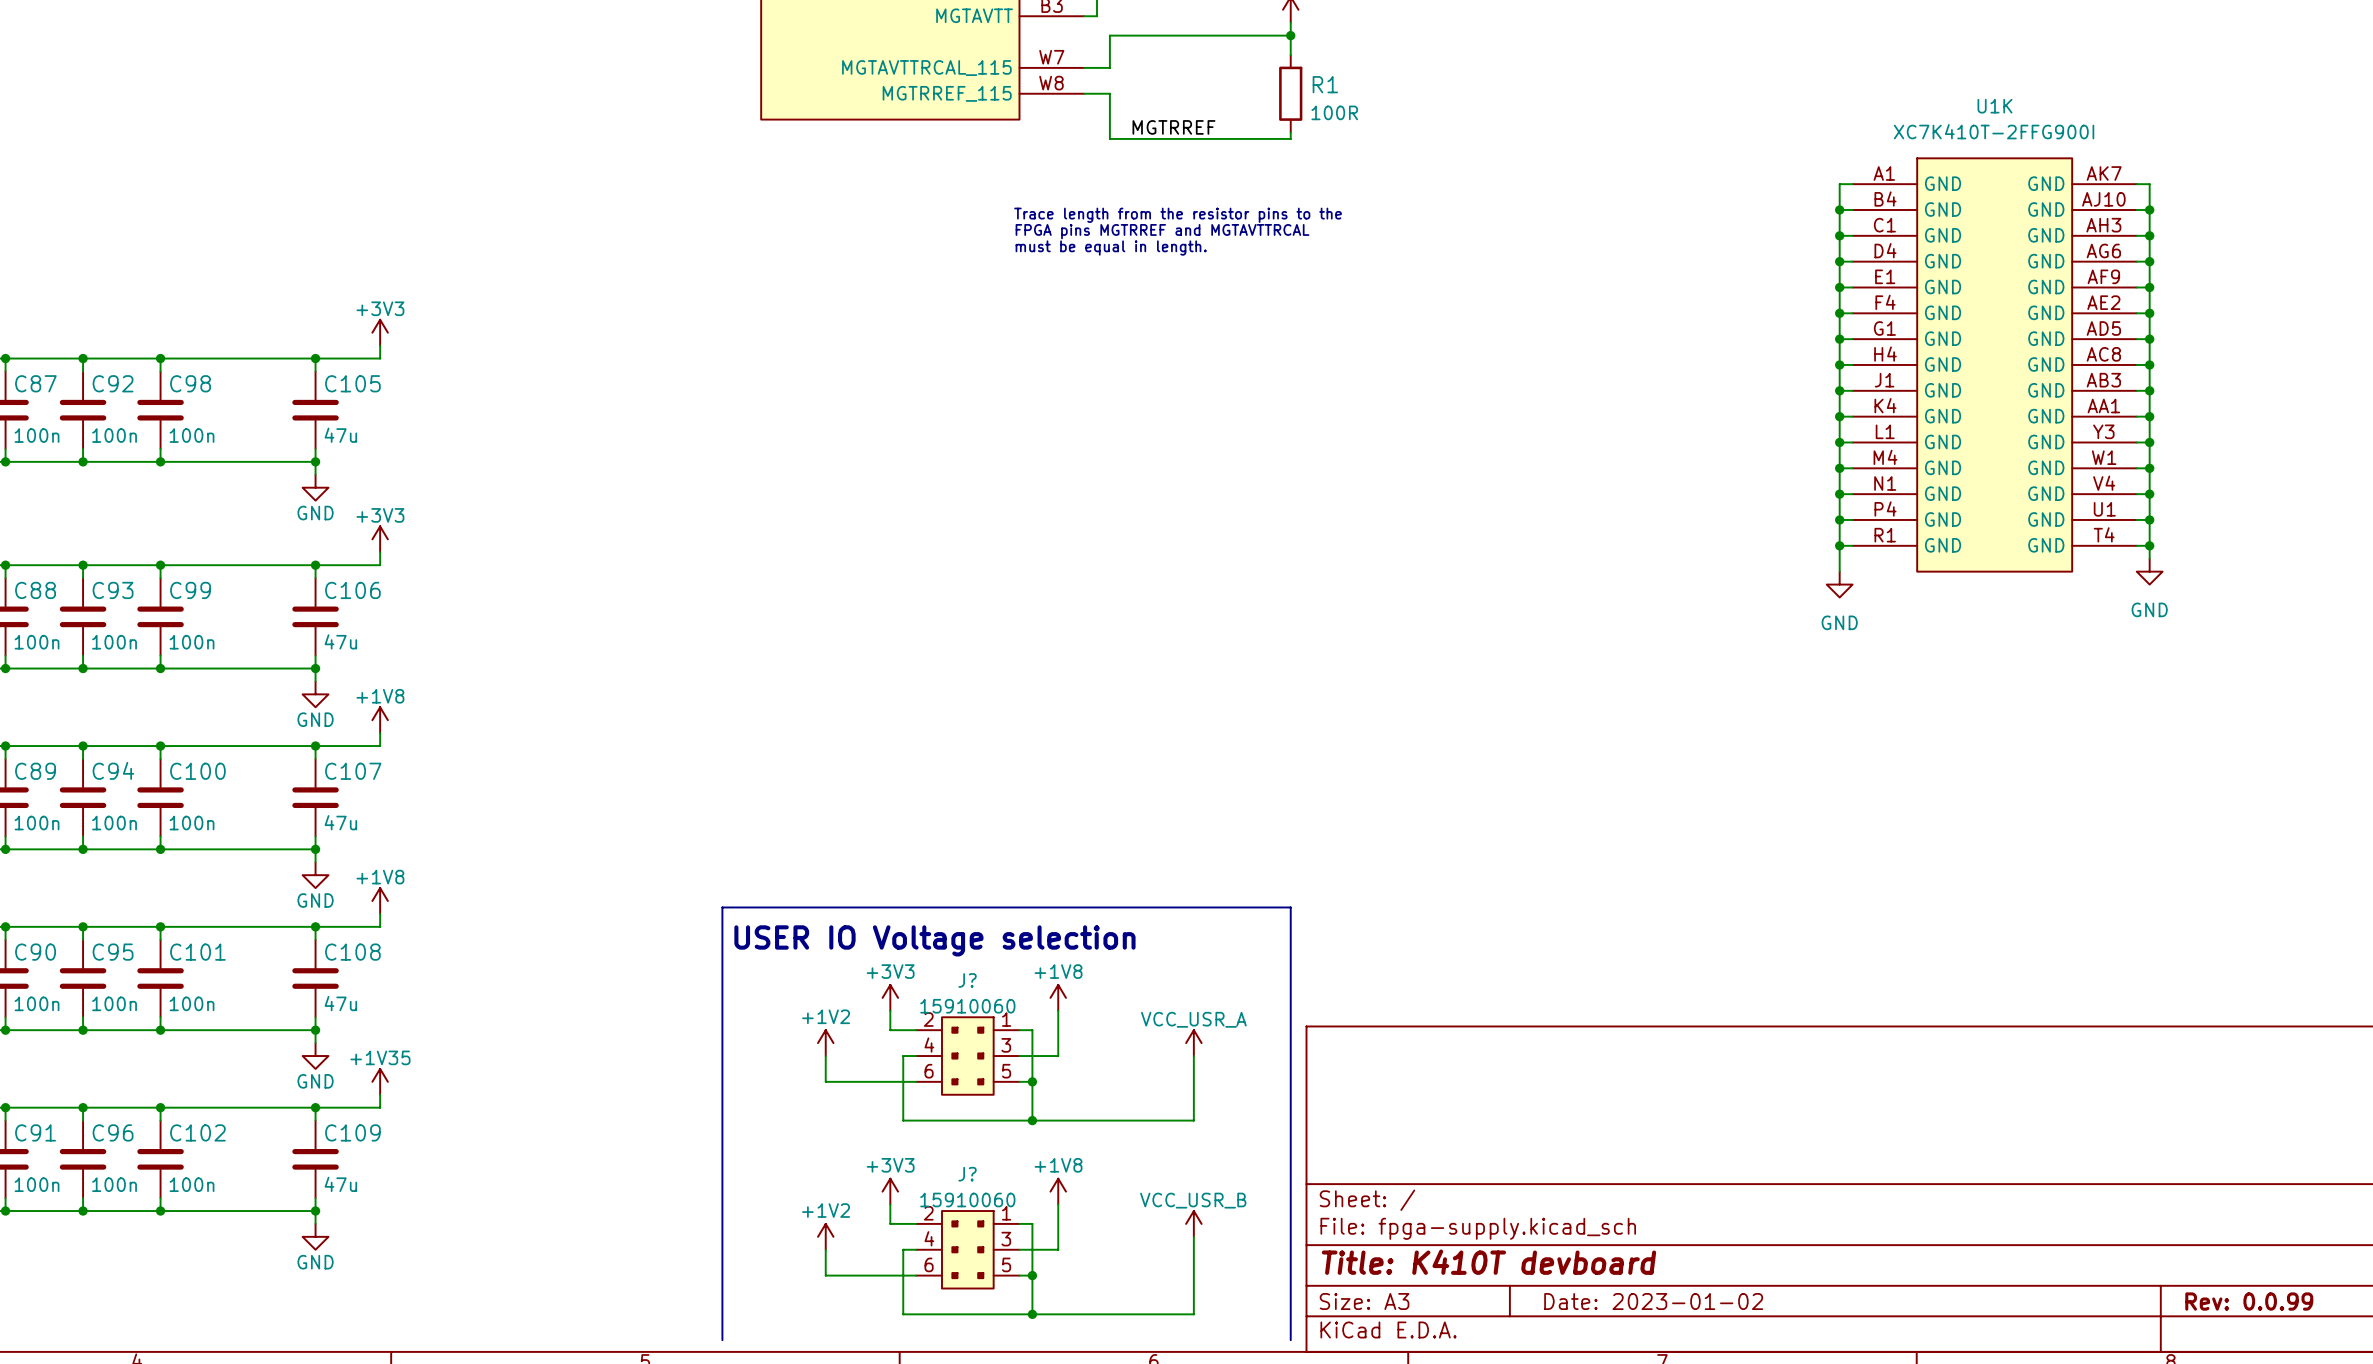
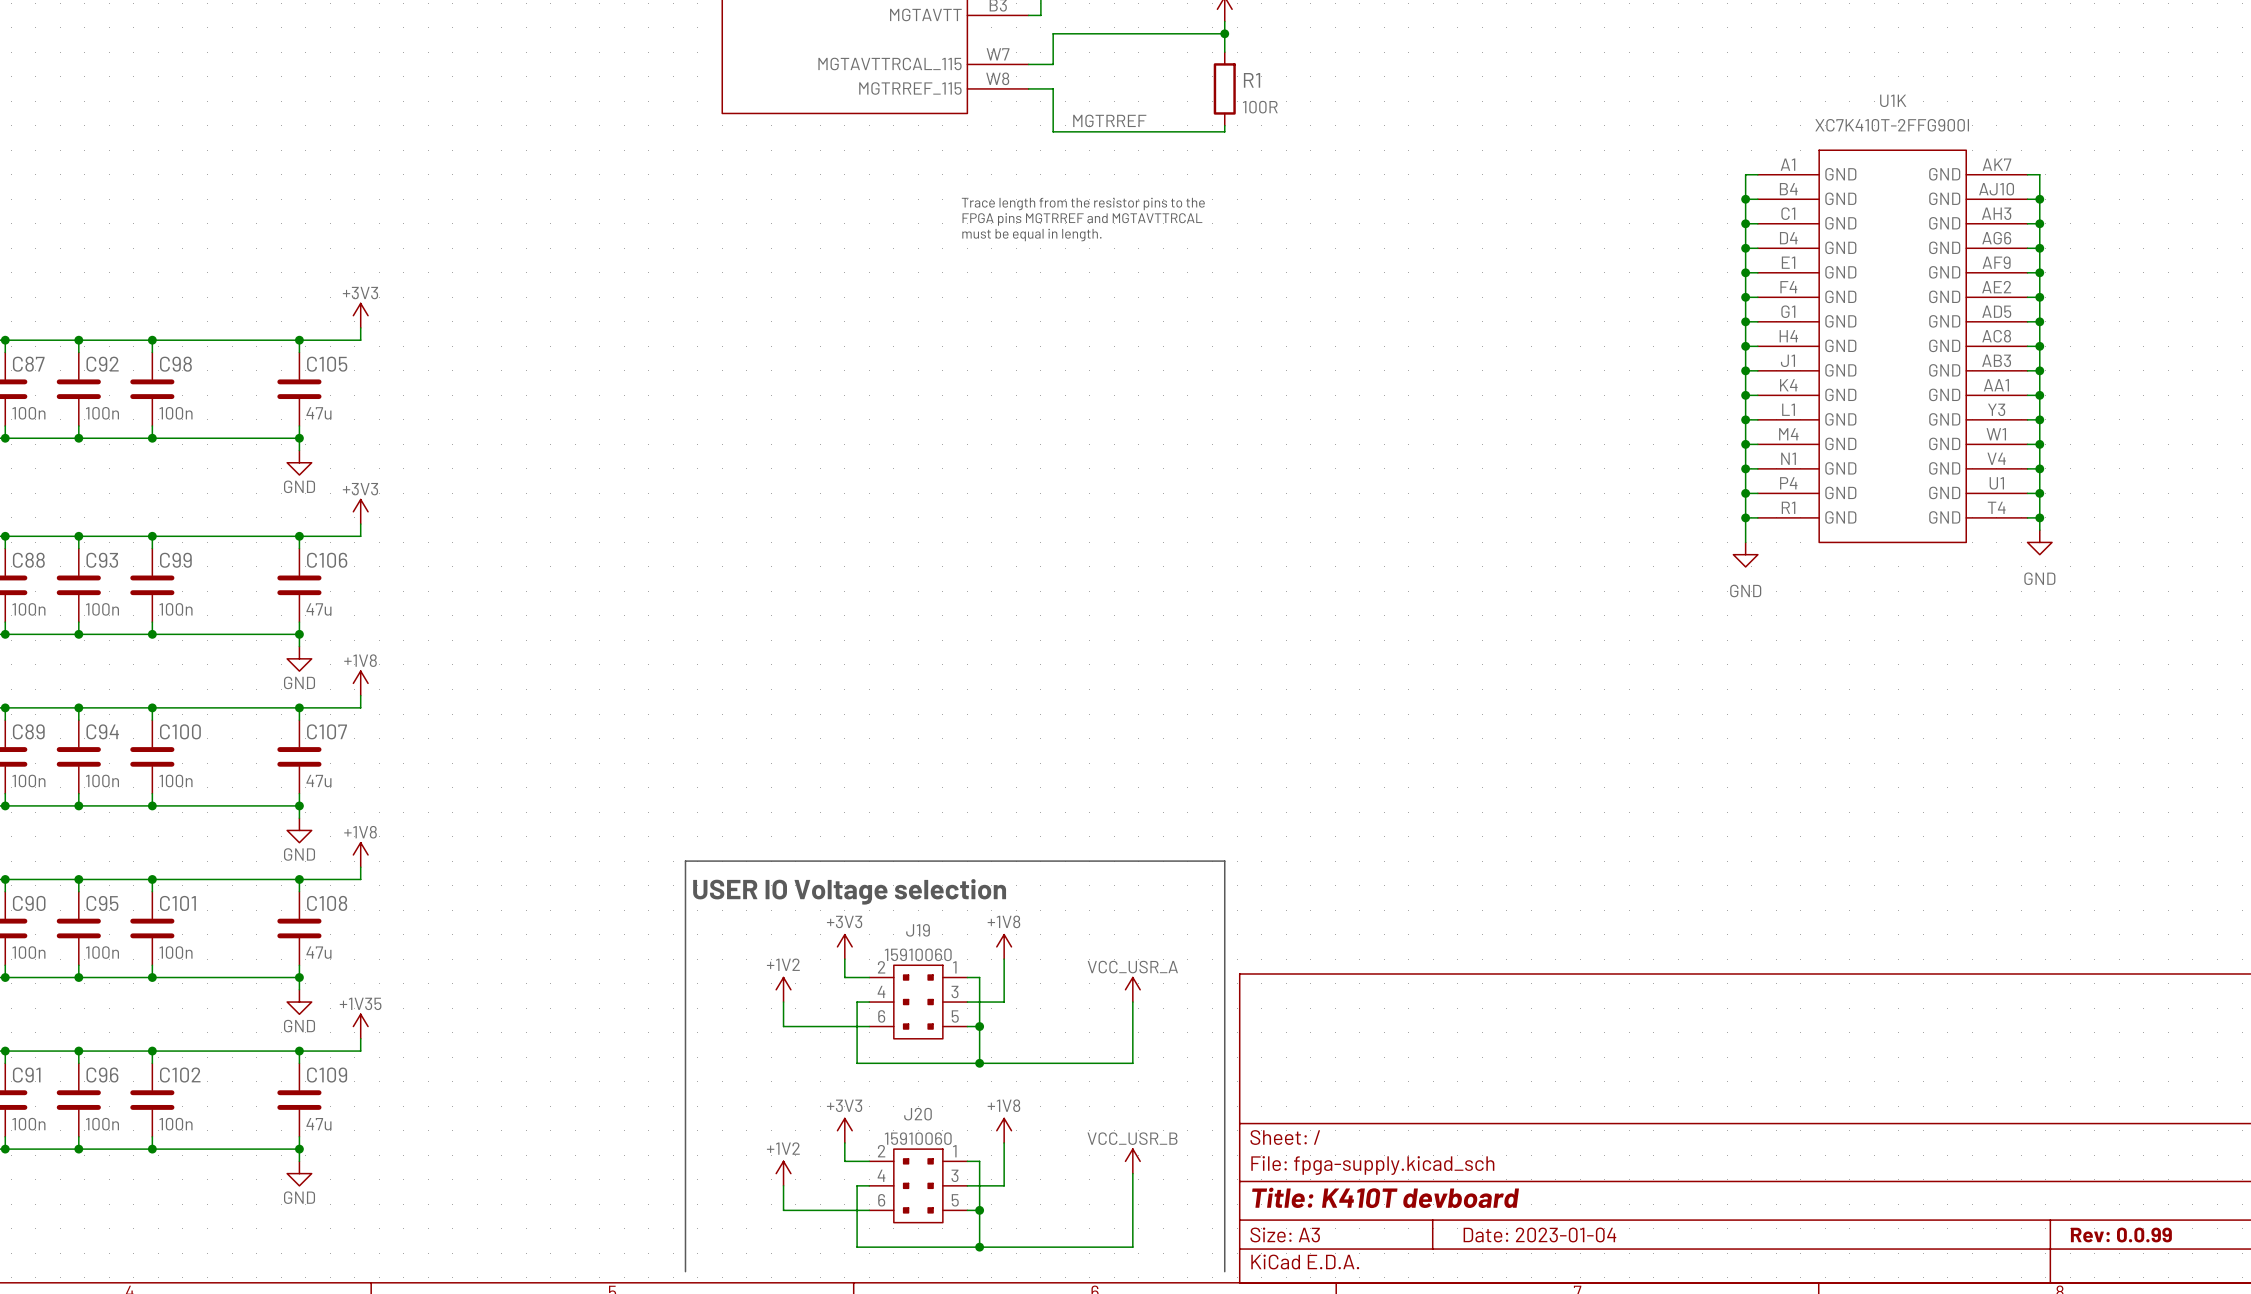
J? name: J? (967, 980) -> J19 (918, 930)
J? name: J? (967, 1174) -> J20 (917, 1114)
title block: Date: 2023-01-02 (1653, 1301) -> Date: 2023-01-04 (1539, 1234)

